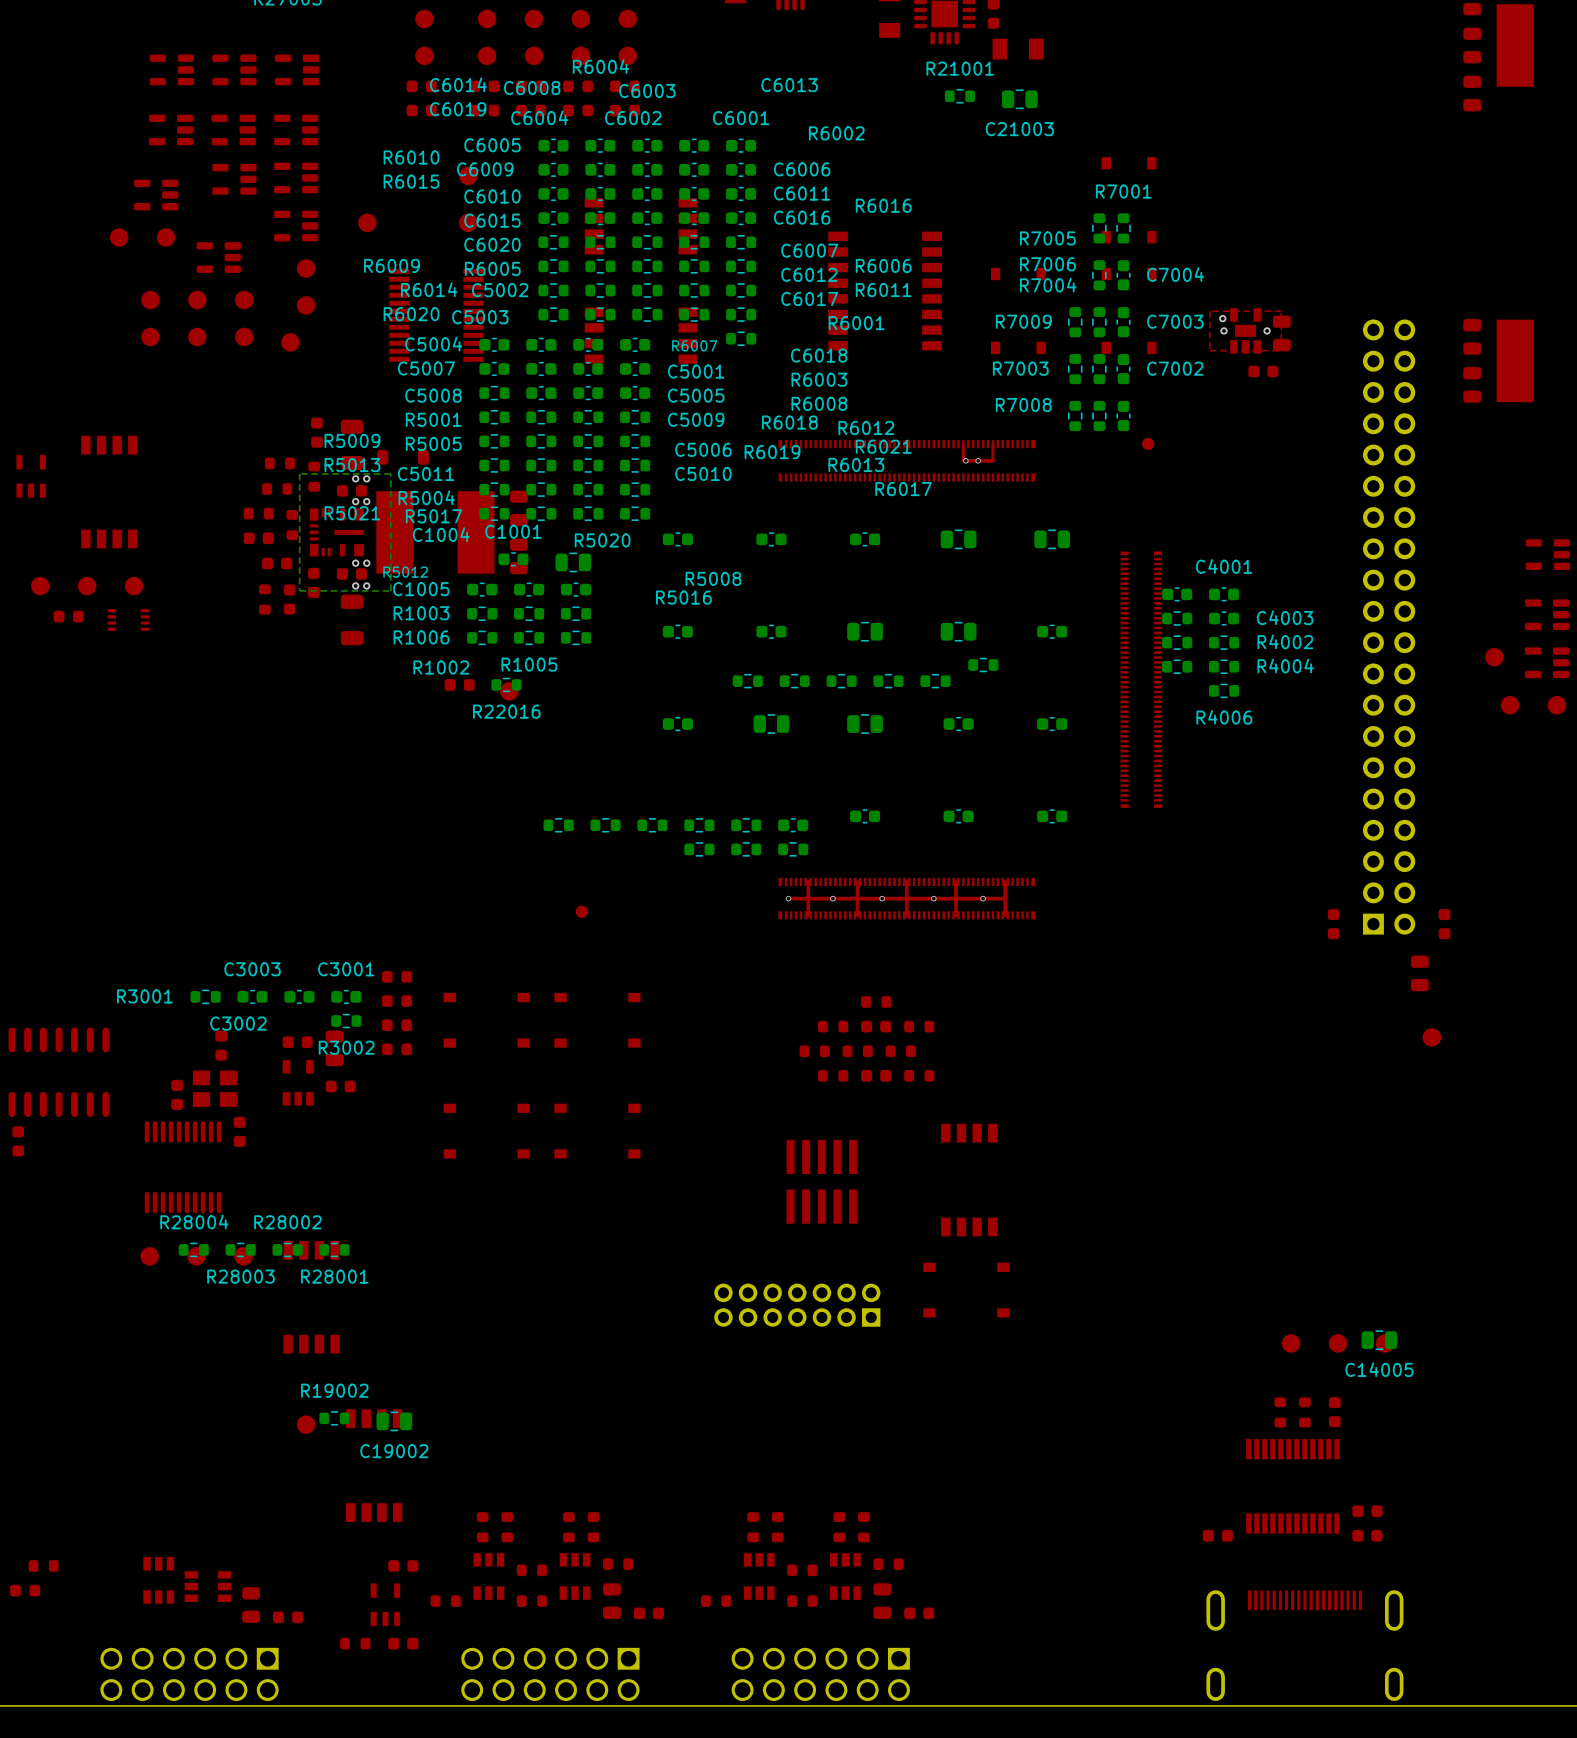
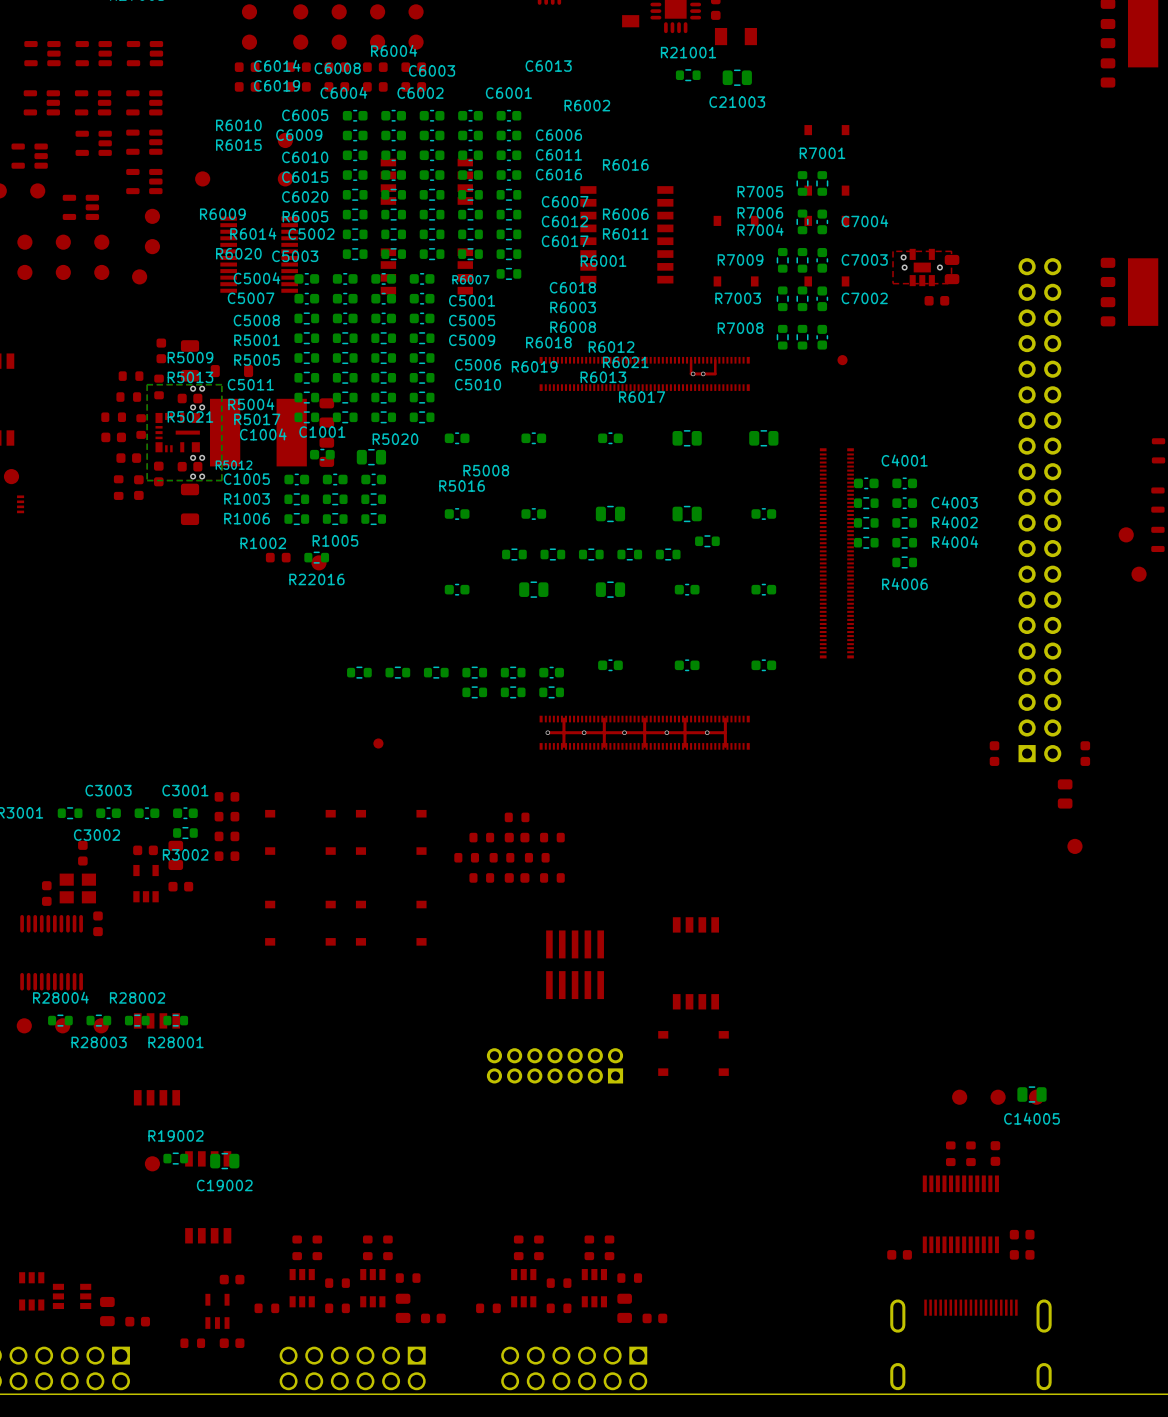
part: none -> (517, 817)
part: (876, 1001) -> none
part: none -> (481, 837)
part: none -> (517, 837)
part: none -> (552, 837)
part: (833, 1026) -> none
part: (876, 1026) -> none
part: (919, 1026) -> none
part: none -> (466, 857)
part: none -> (501, 857)
part: none -> (537, 857)
part: (814, 1051) -> none
part: (857, 1051) -> none
part: (900, 1051) -> none
part: none -> (481, 877)
part: none -> (517, 877)
part: none -> (552, 877)
part: (833, 1075) -> none
part: (876, 1075) -> none
part: (919, 1075) -> none

